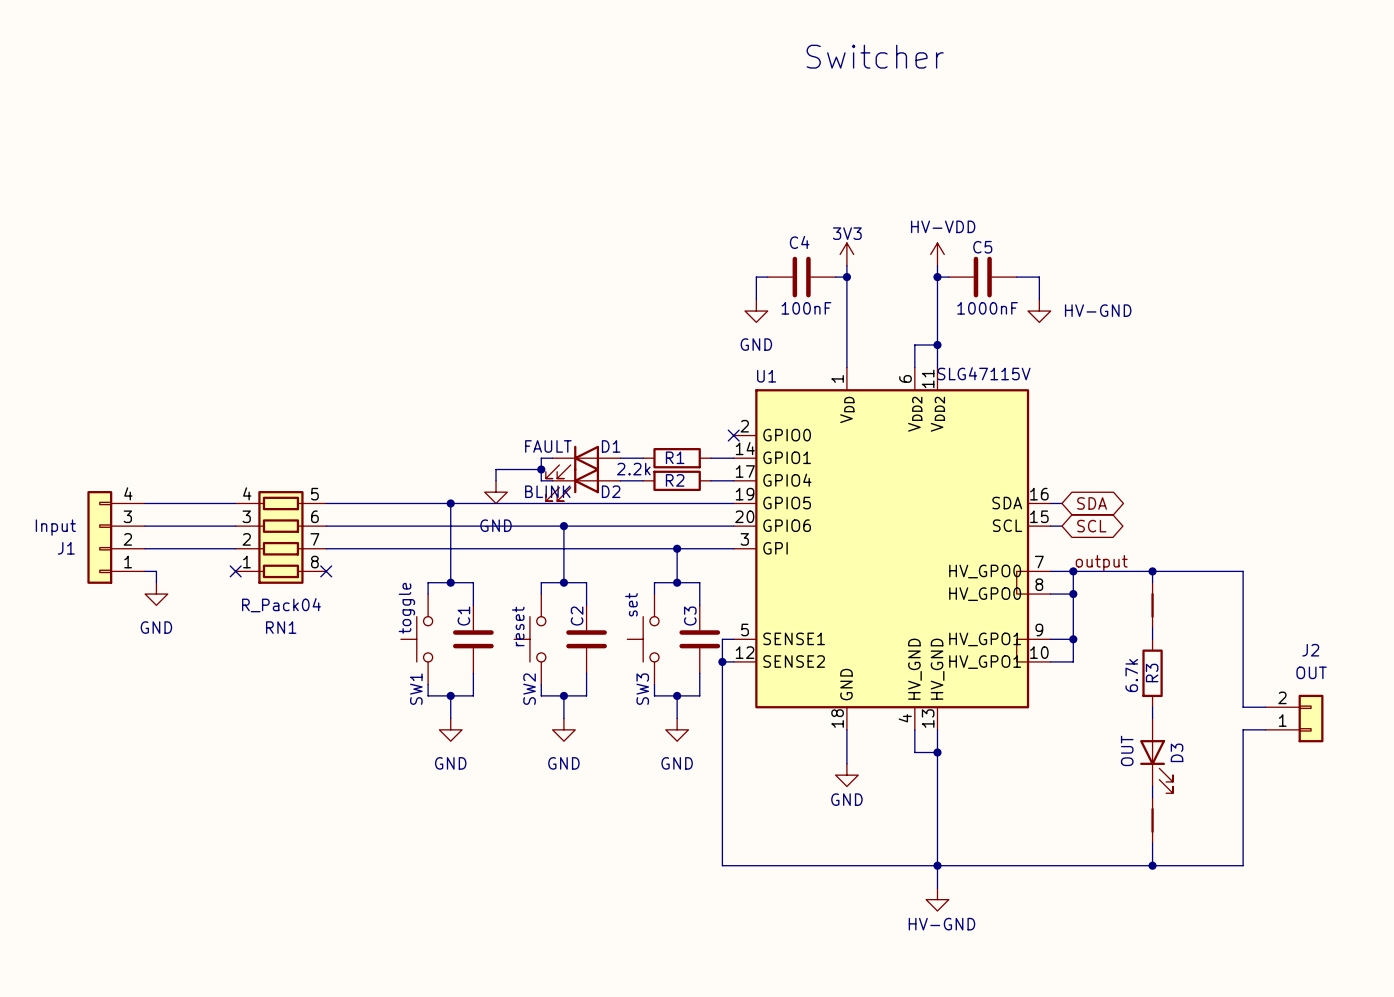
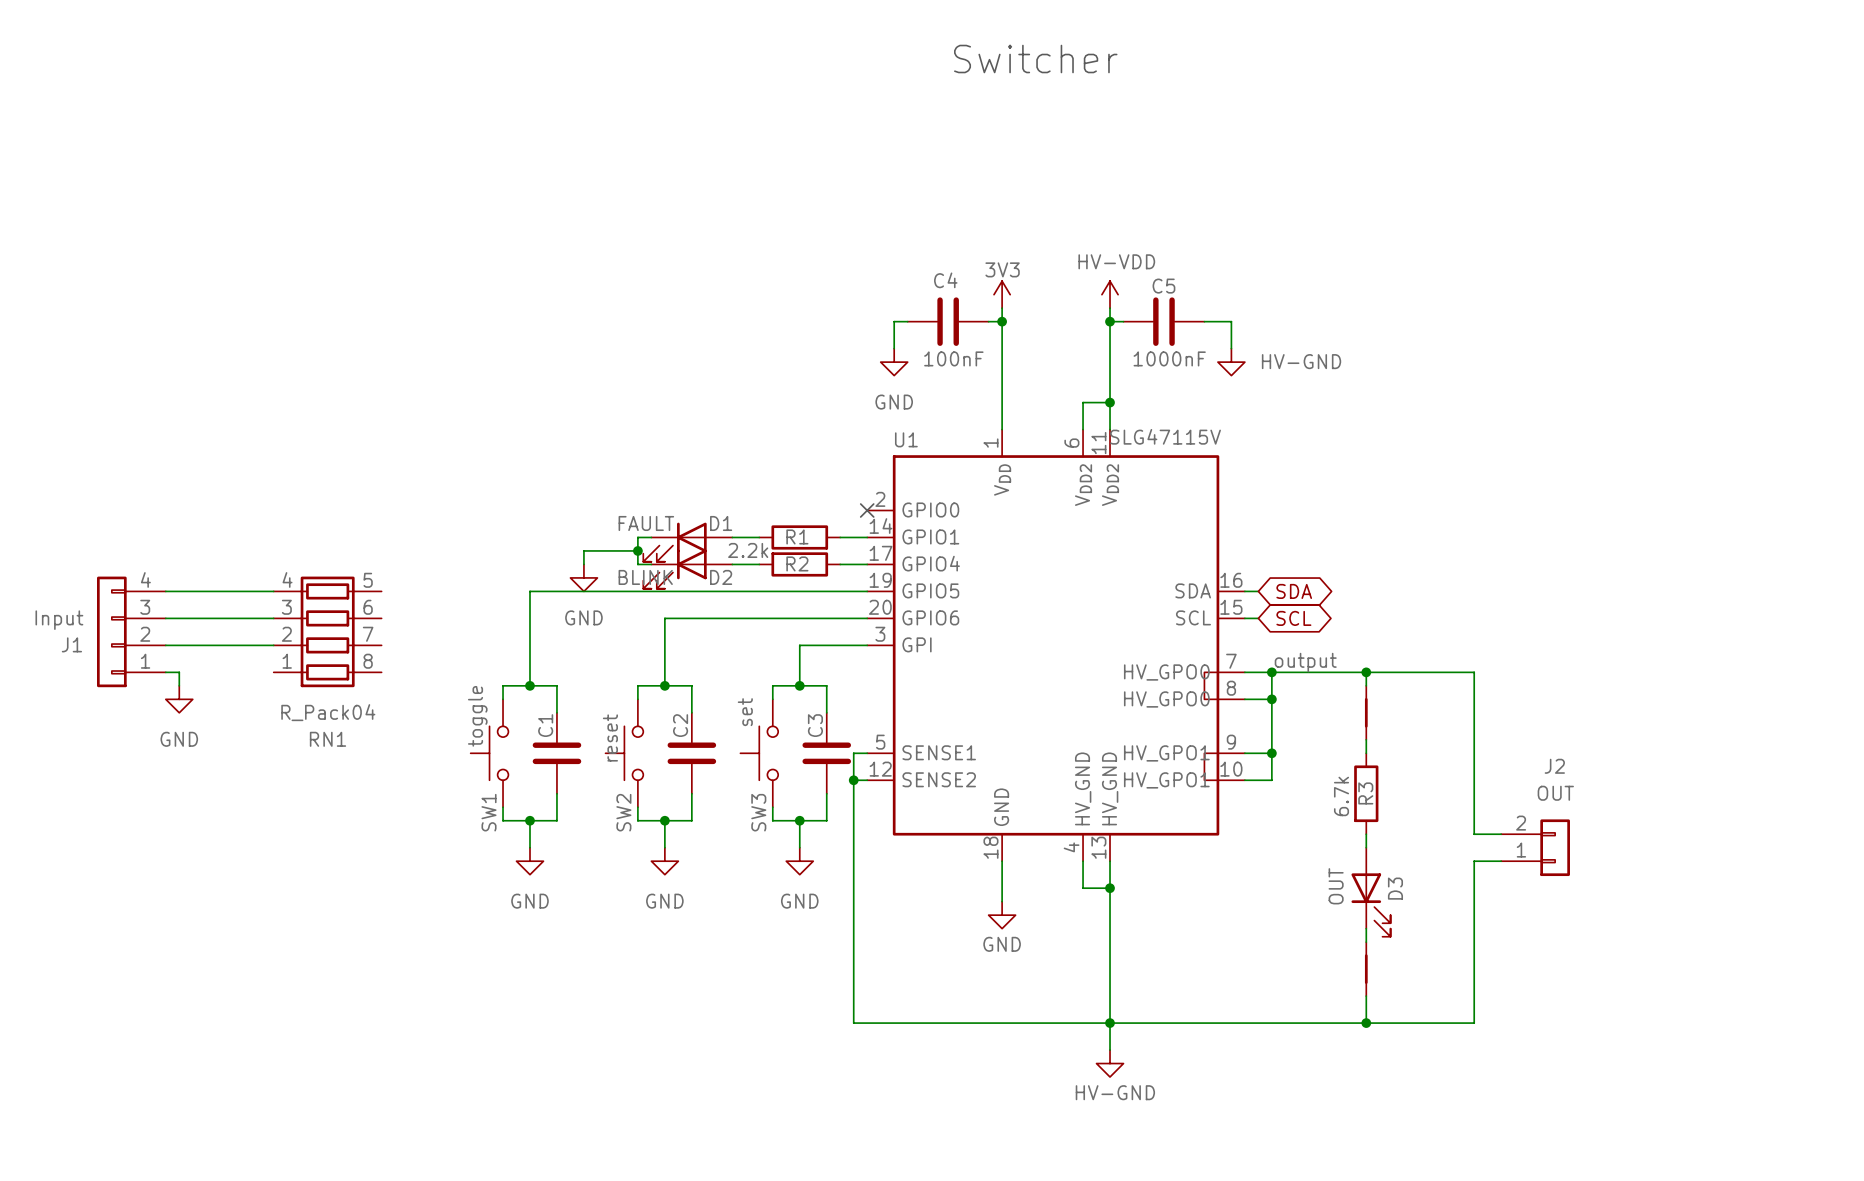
wire: (326, 503) (450, 503) -> none
junction: (450, 503) -> none
wire: (326, 526) (563, 526) -> none
junction: (563, 526) -> none
wire: (326, 548) (677, 548) -> none
junction: (677, 548) -> none
no-connect mark: (235, 571) -> none
no-connect mark: (326, 571) -> none

